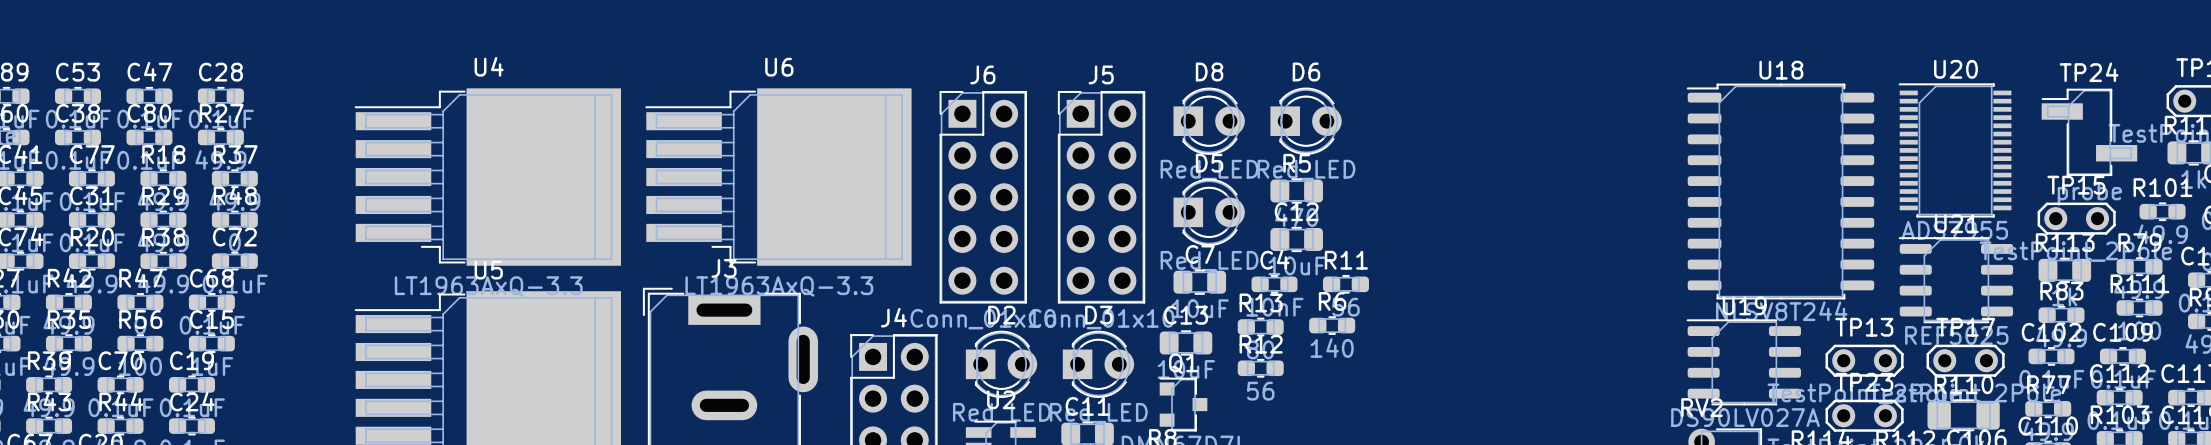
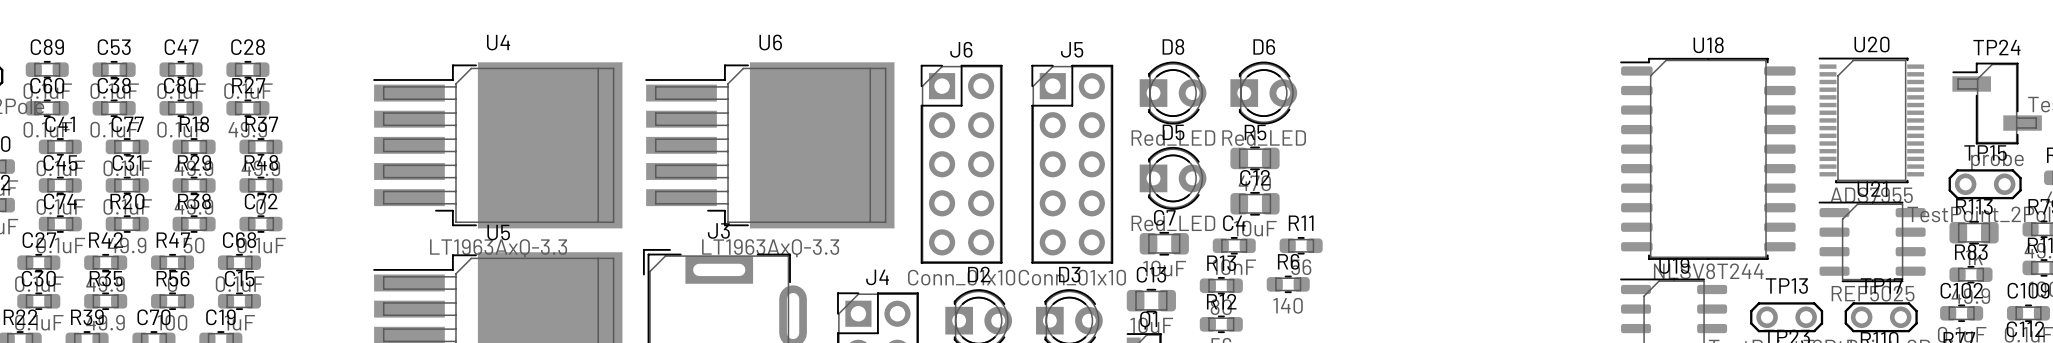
R38 value: 49.9 (163, 283) -> 50 (194, 245)

